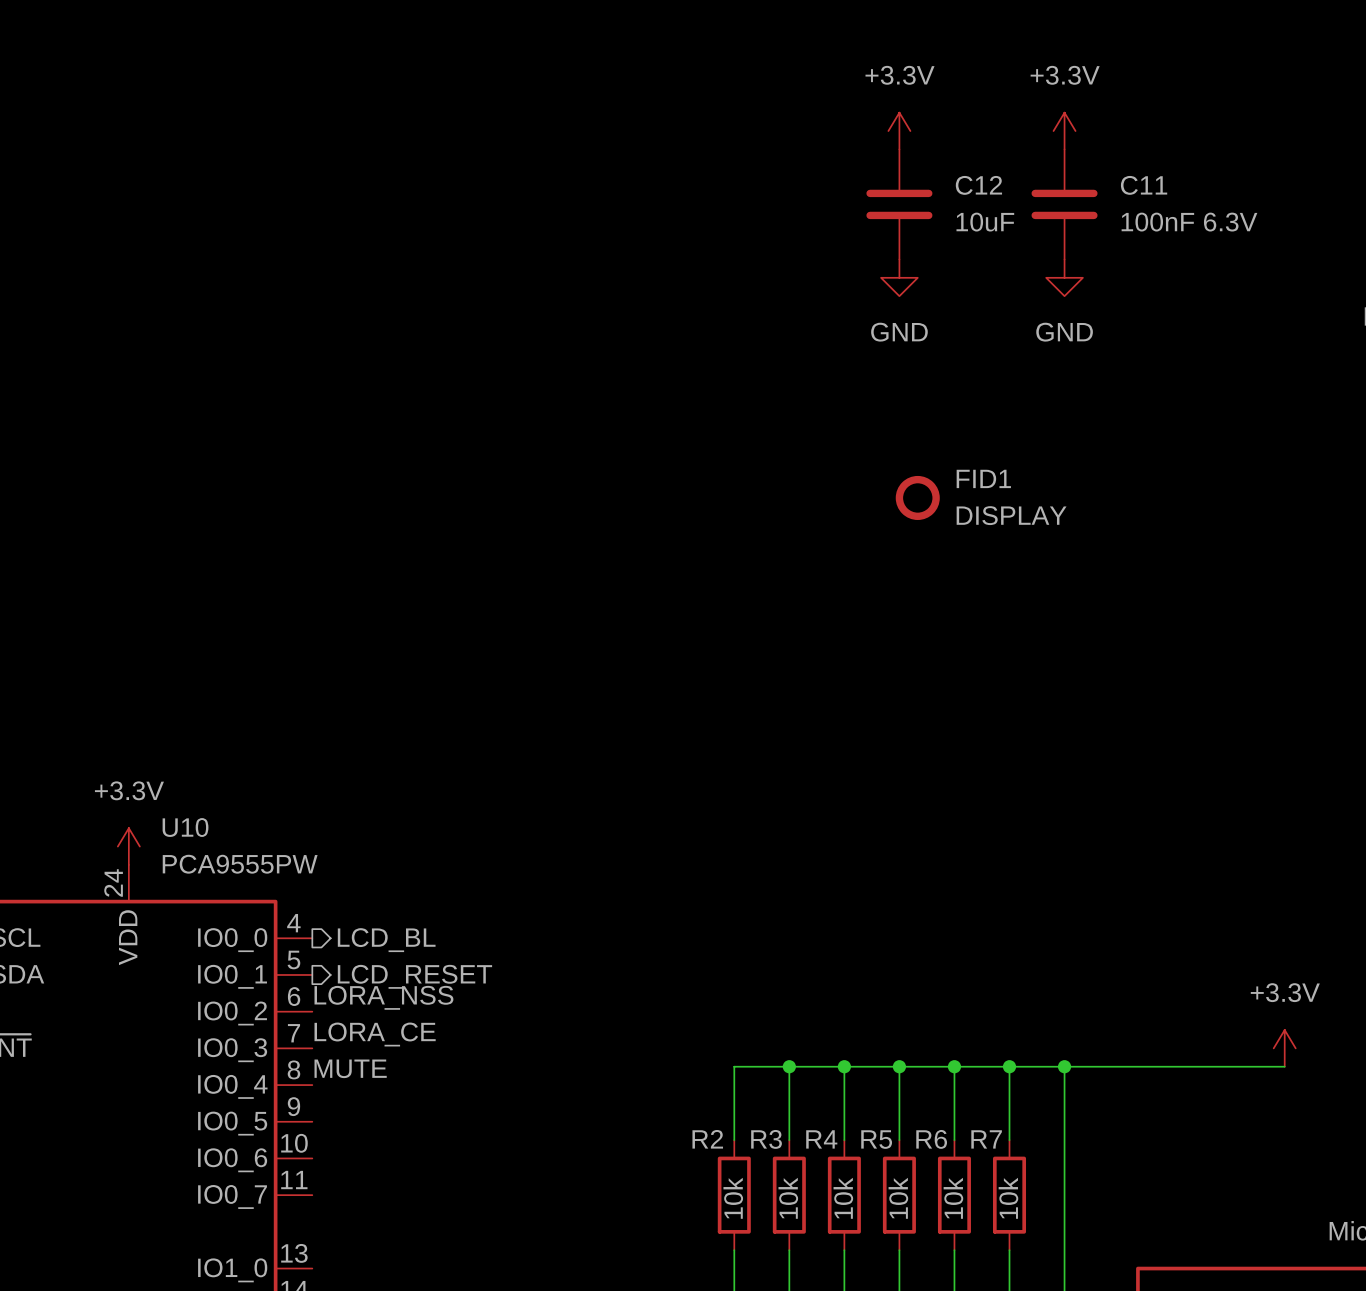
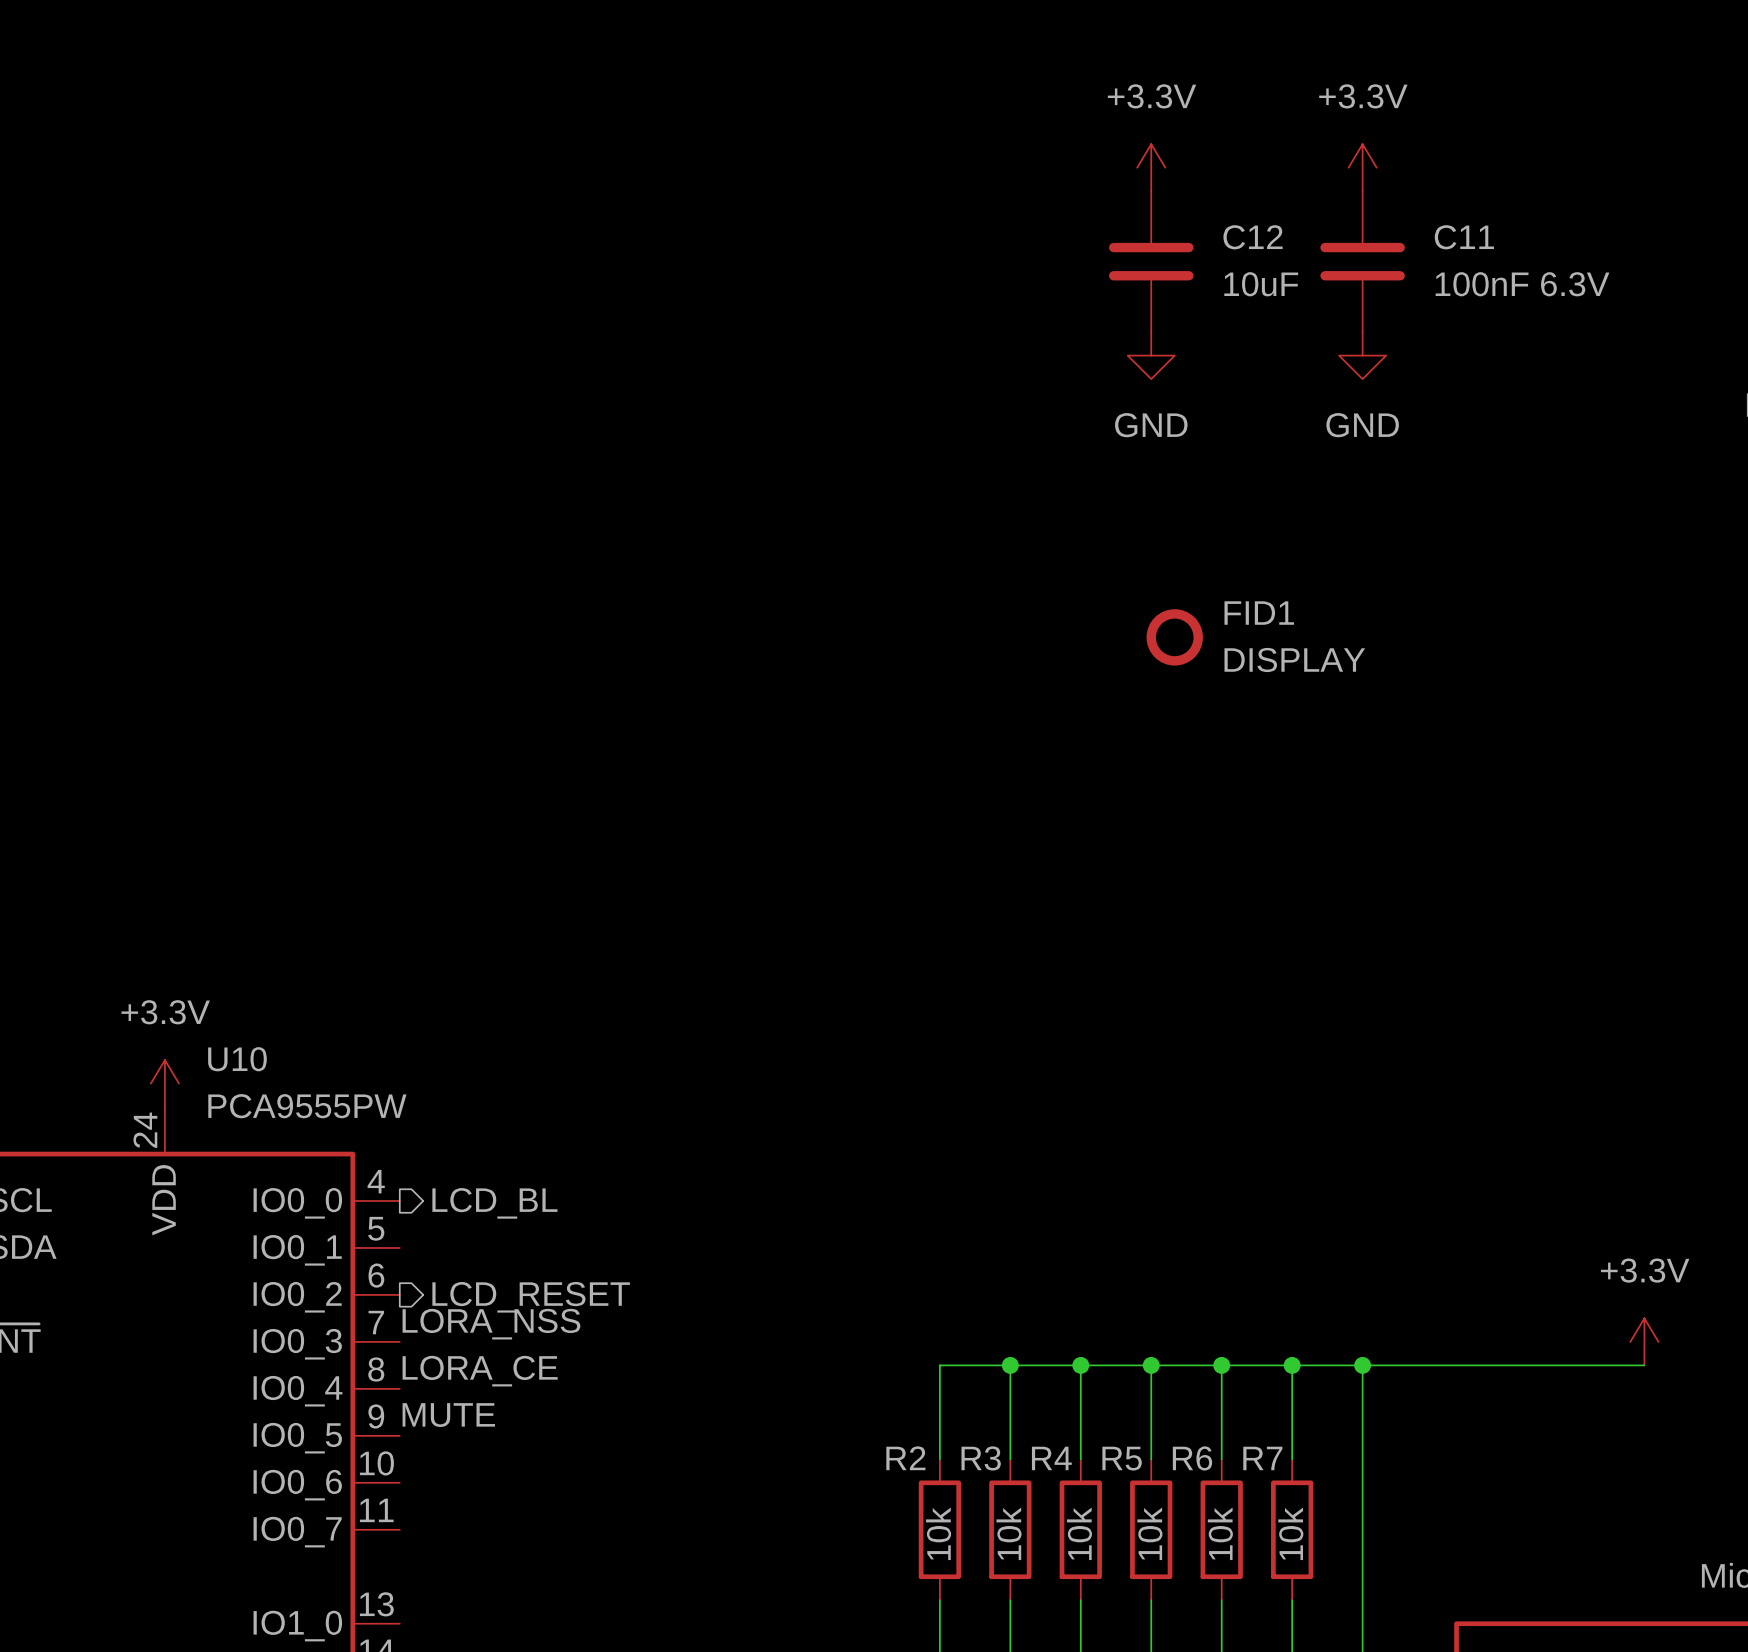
hierarchical label position: LCD_RESET (414, 976) -> LCD_RESET (531, 1297)
label: LORA_NSS (383, 997) -> none
label: LORA_CE (375, 1034) -> LORA_NSS (491, 1324)
label: MUTE (350, 1068) -> LORA_CE (480, 1371)
label: none -> MUTE (448, 1415)

